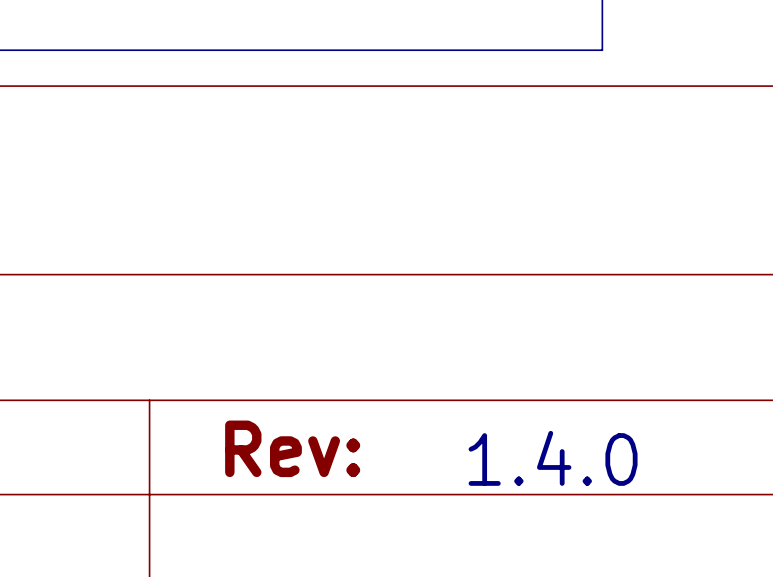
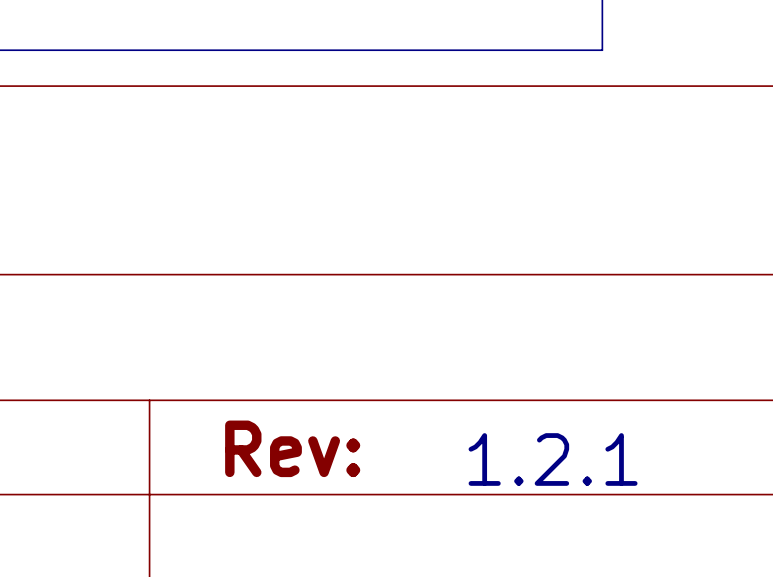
text: 1.4.0 (553, 458) -> 1.2.1 (553, 459)

